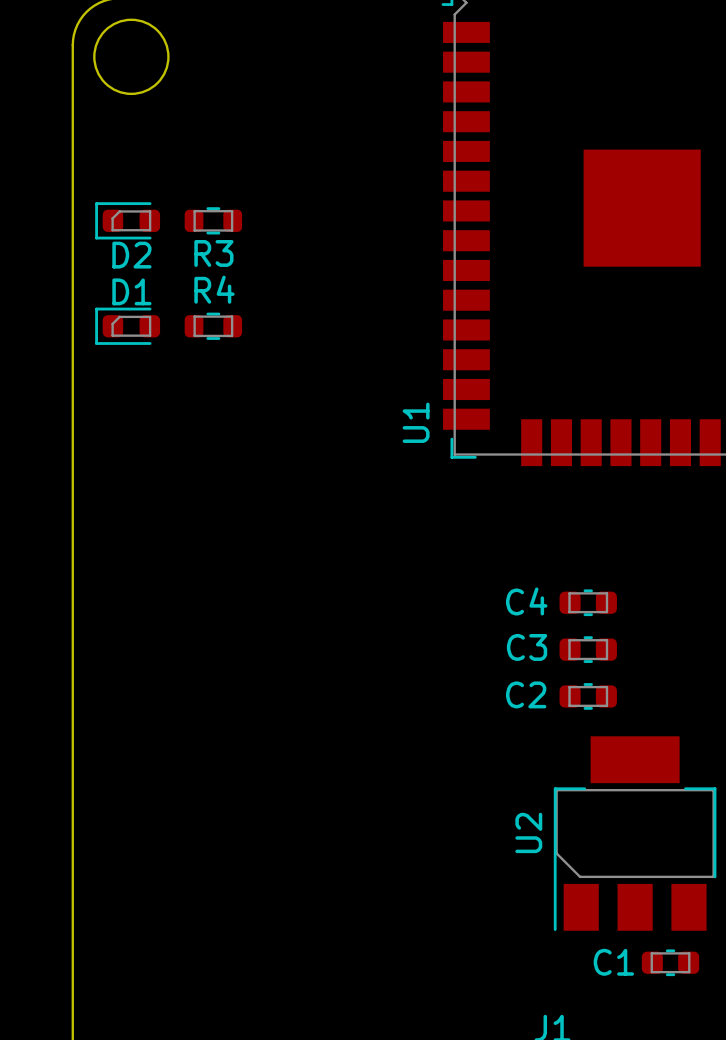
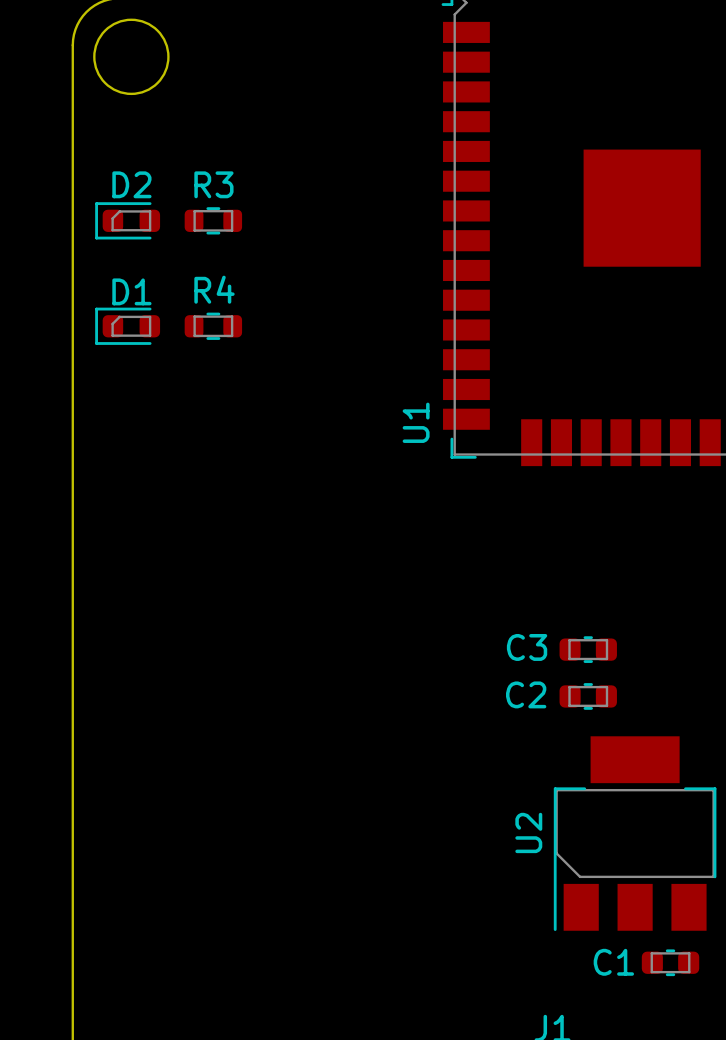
R3 name position: R3 (213, 253) -> R3 (213, 184)
D2 name position: D2 (131, 255) -> D2 (131, 184)
C4: (588, 602) -> none

